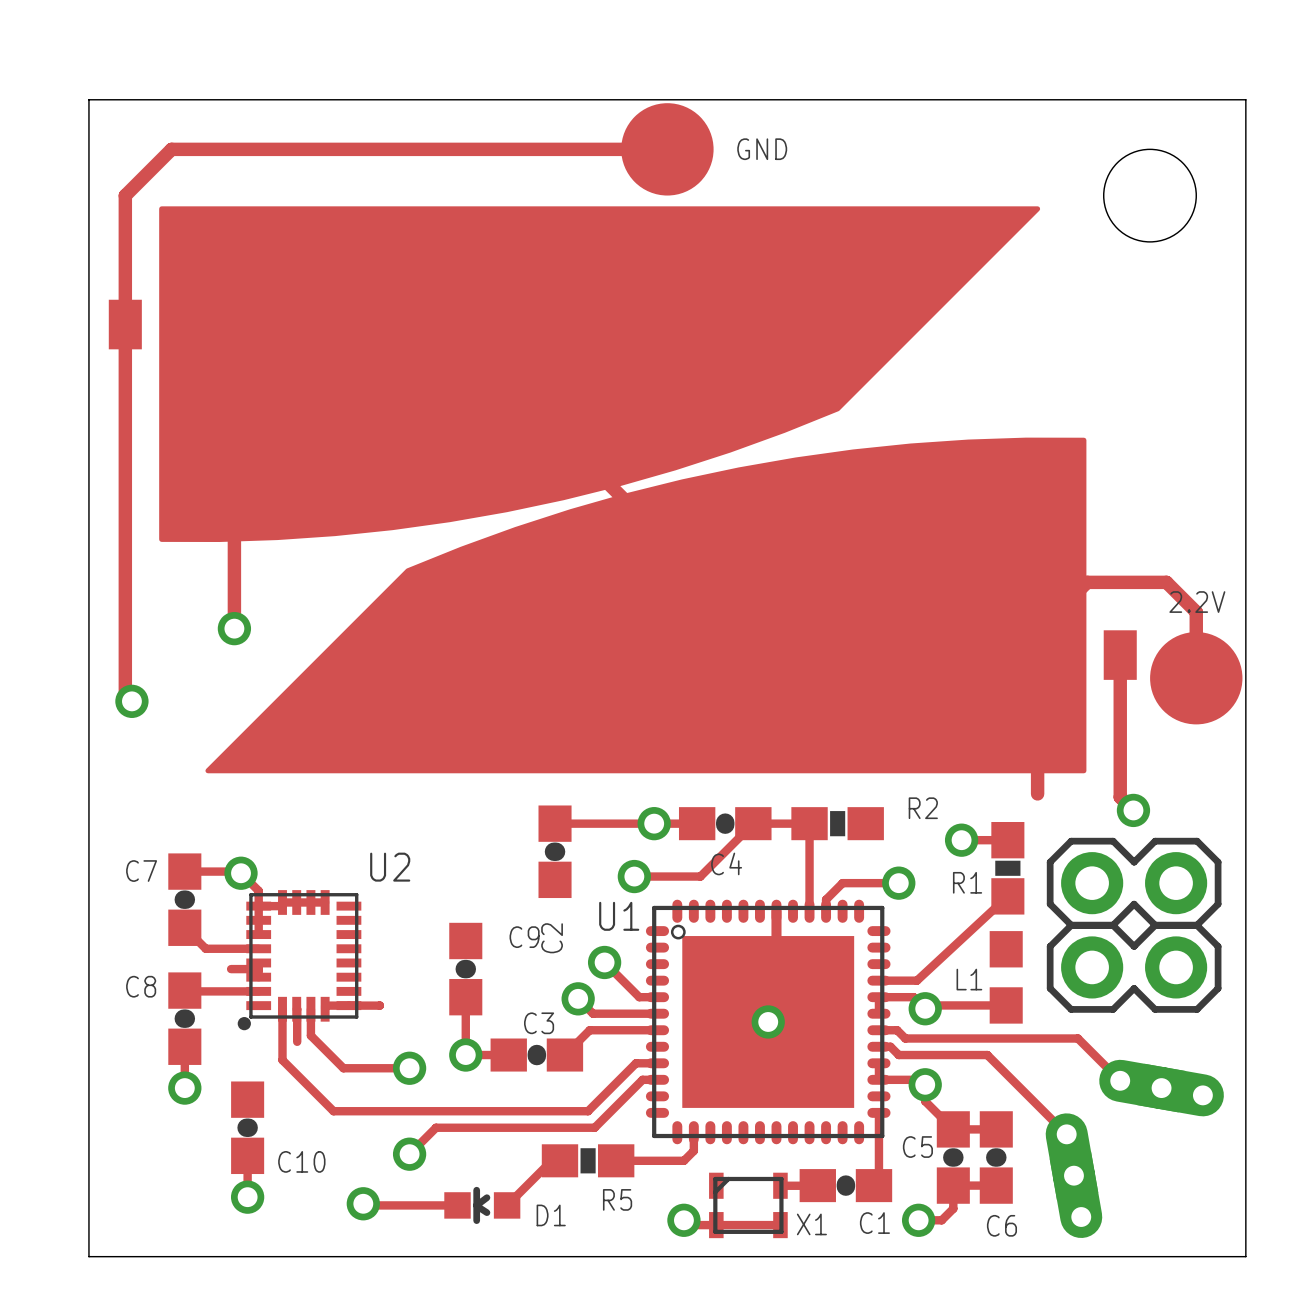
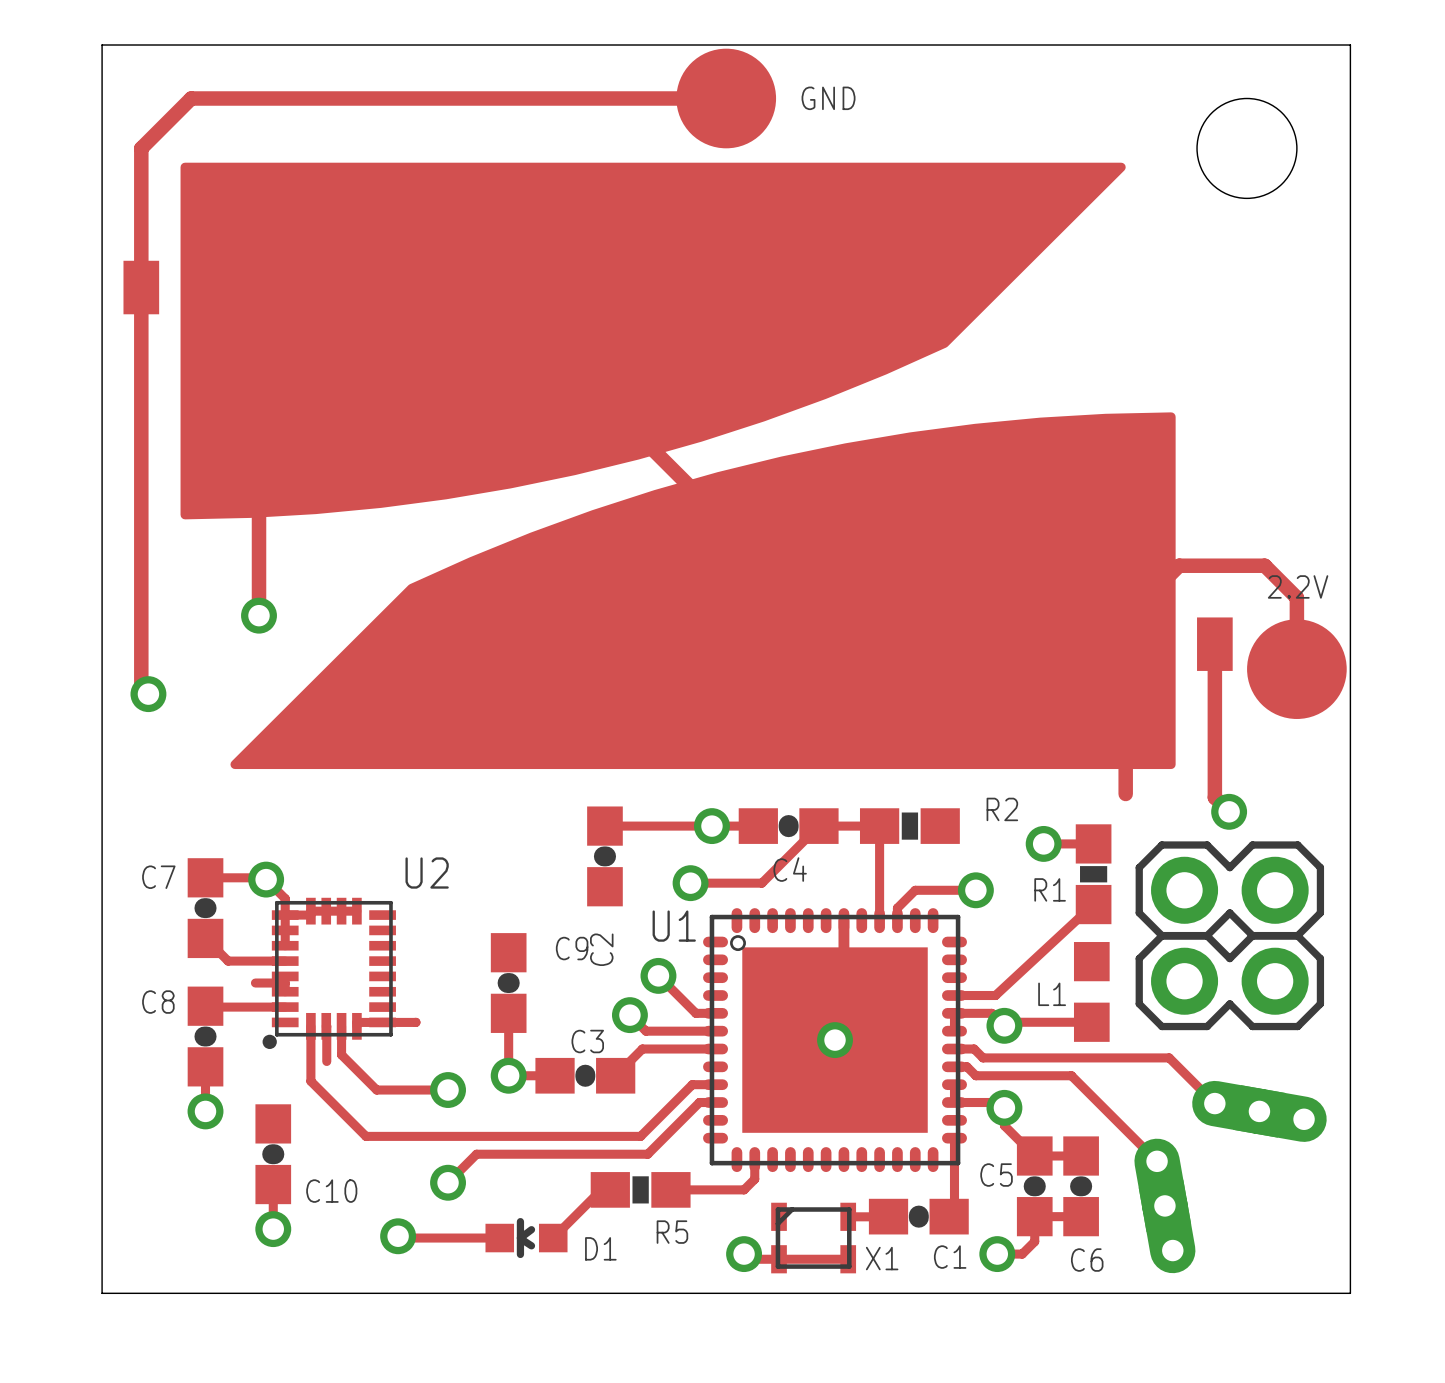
part footprint: [108, 206, 1041, 543] -> [123, 162, 1126, 520]
part footprint: [205, 437, 1137, 774] -> [230, 412, 1233, 770]

